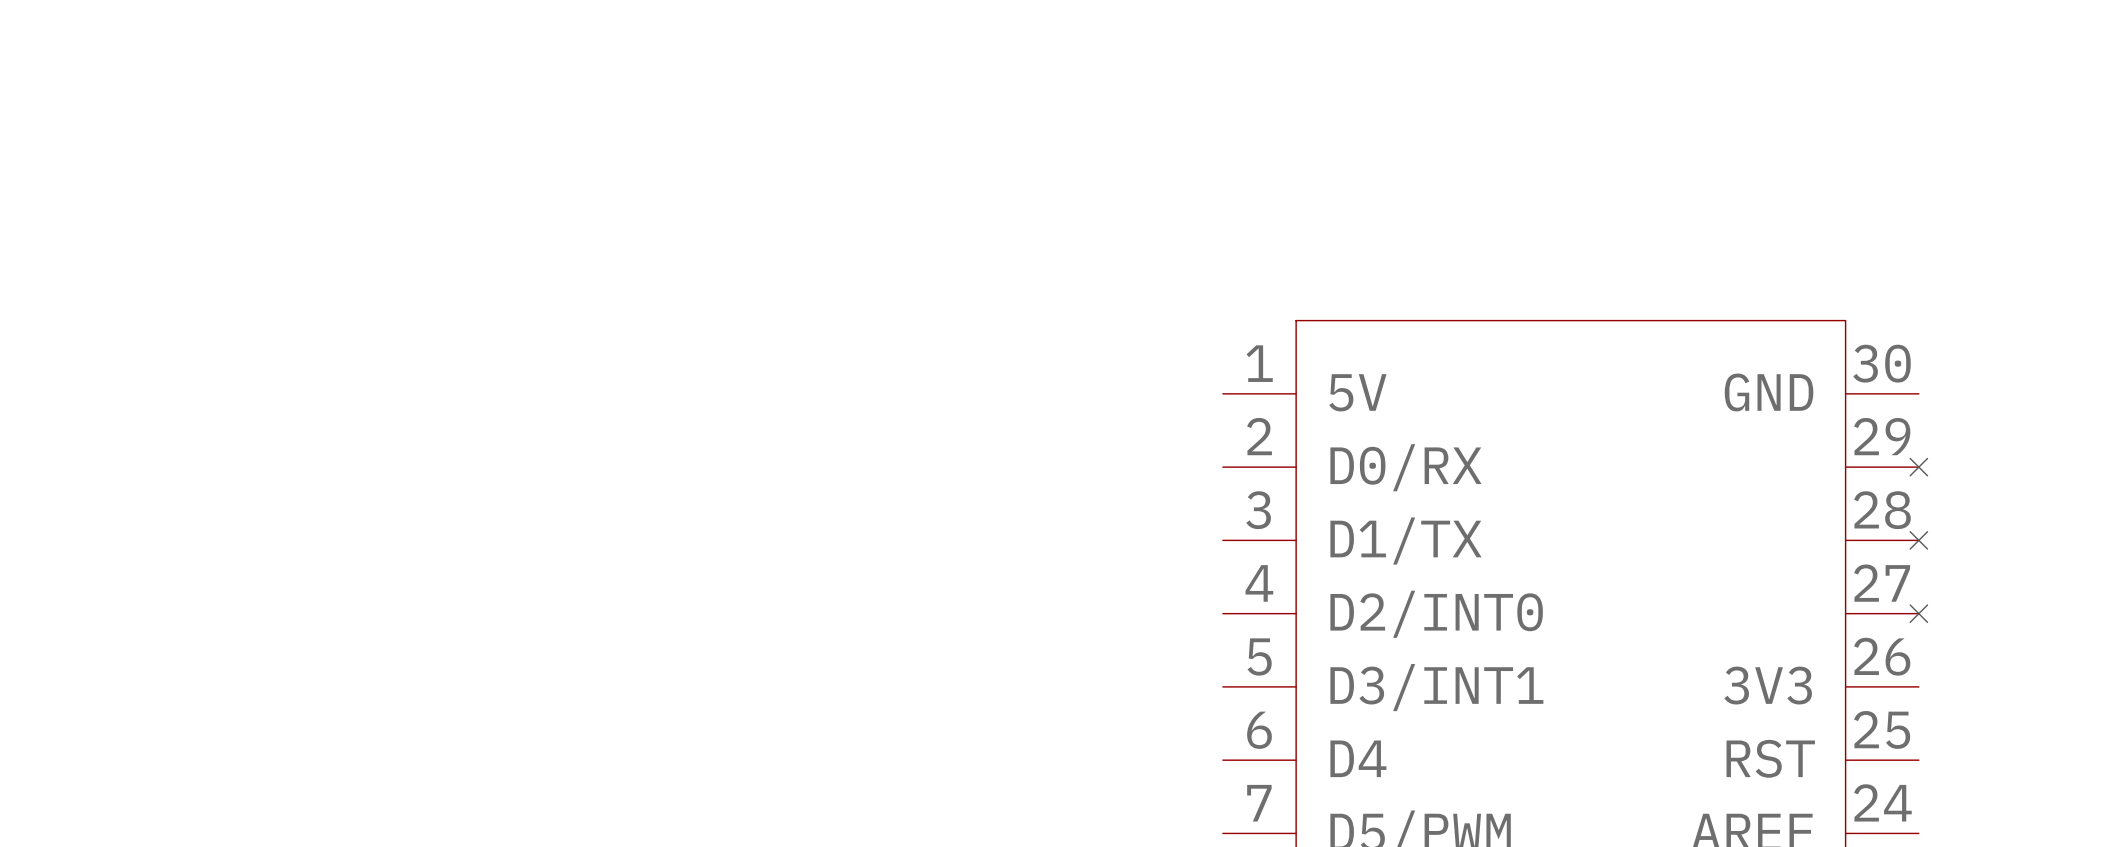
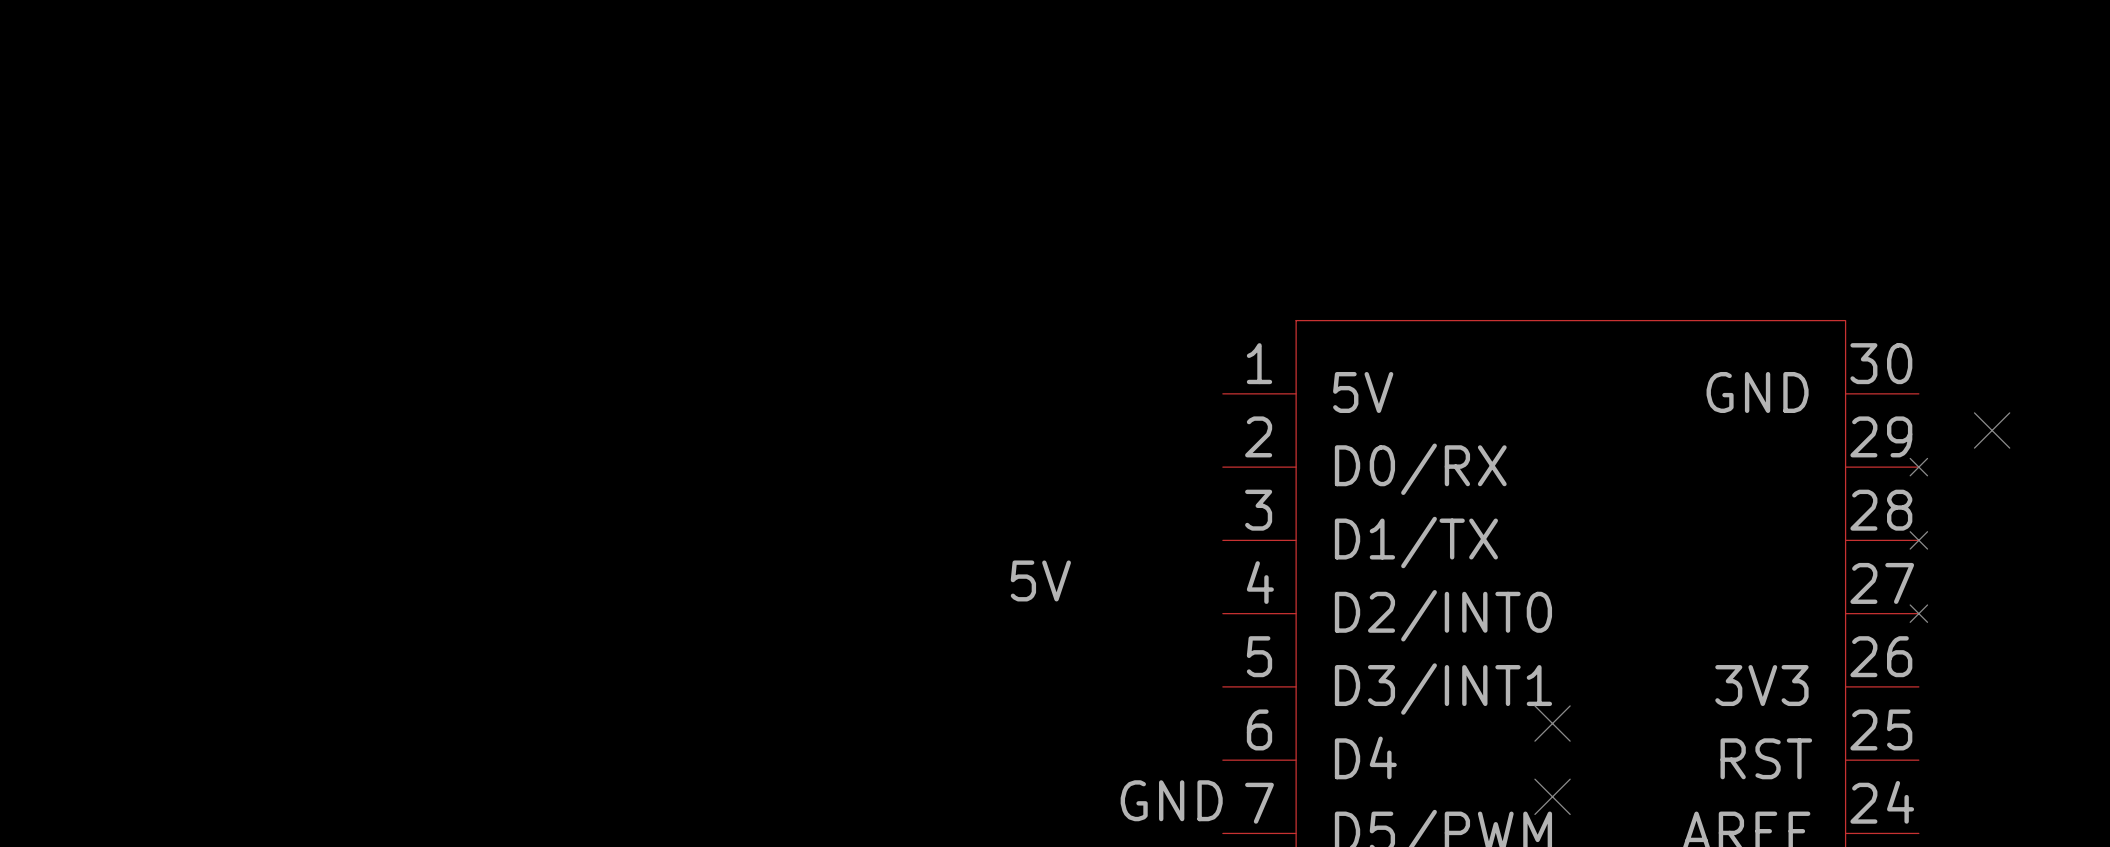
no-connect mark: none -> (1992, 430)
label: none -> 5V (1040, 580)
no-connect mark: none -> (1552, 723)
no-connect mark: none -> (1552, 796)
label: none -> GND (1171, 800)

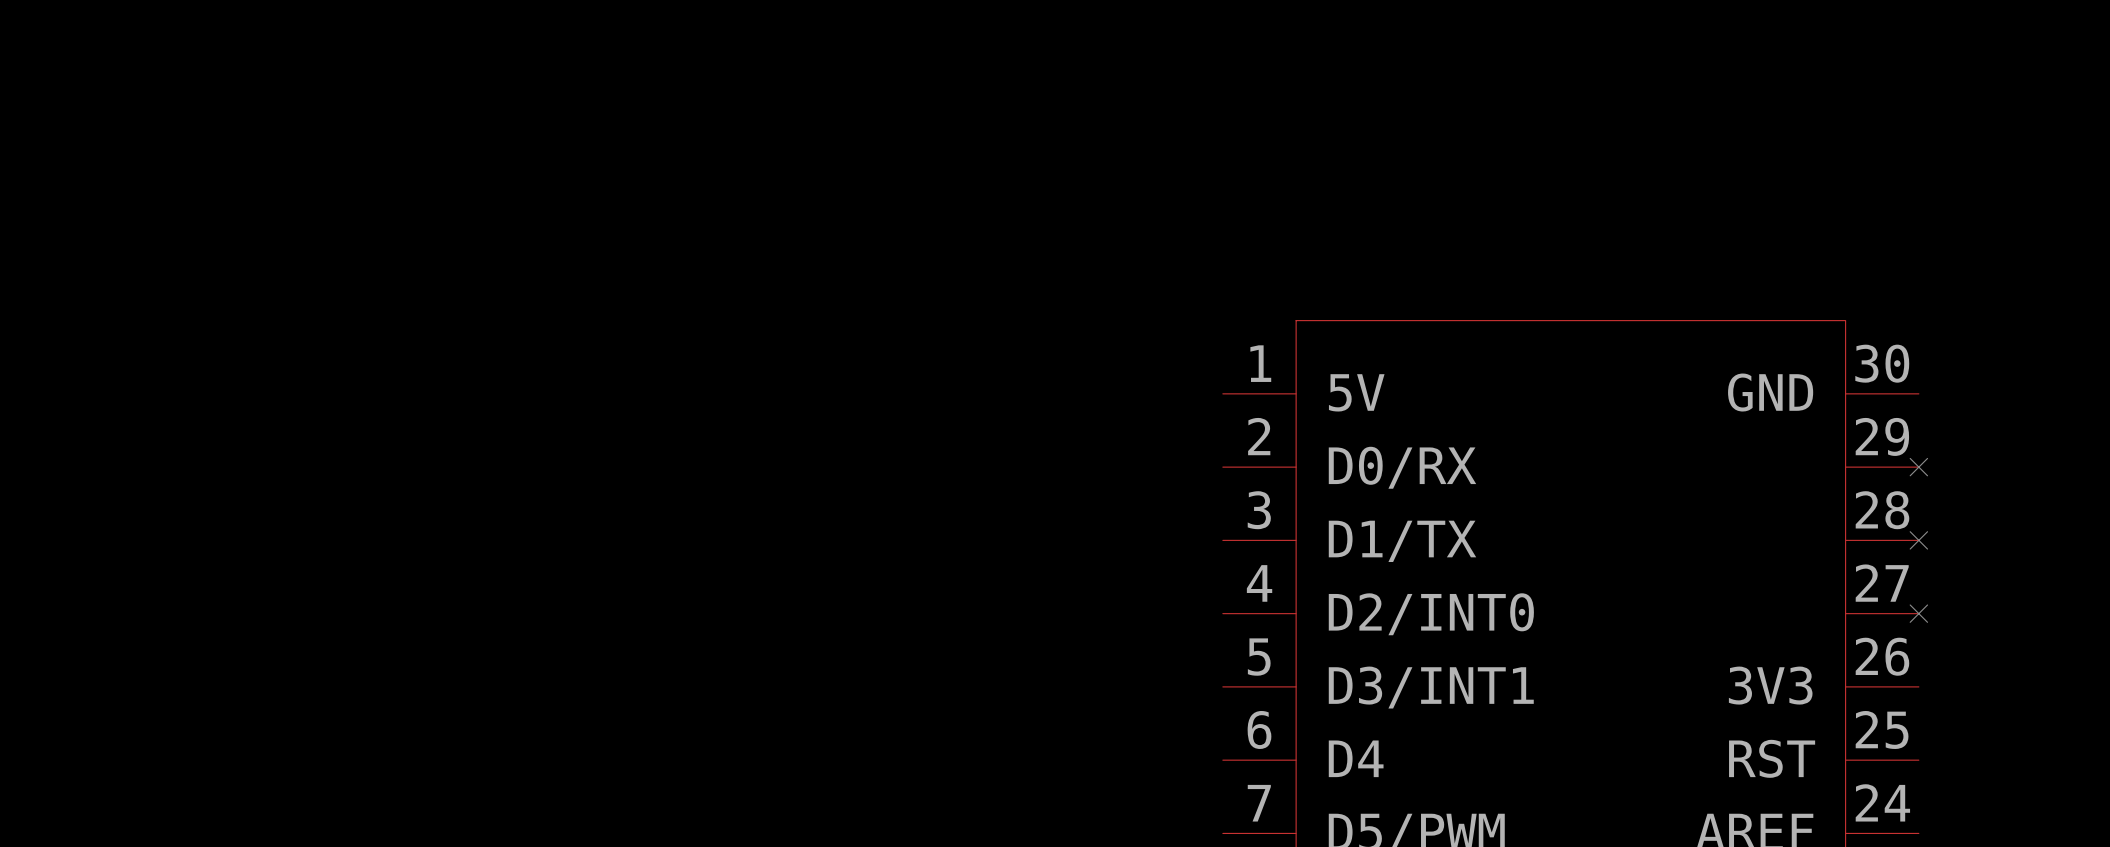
no-connect mark: (1992, 430) -> none
label: 5V (1040, 580) -> none
no-connect mark: (1552, 723) -> none
no-connect mark: (1552, 796) -> none
label: GND (1171, 800) -> none

